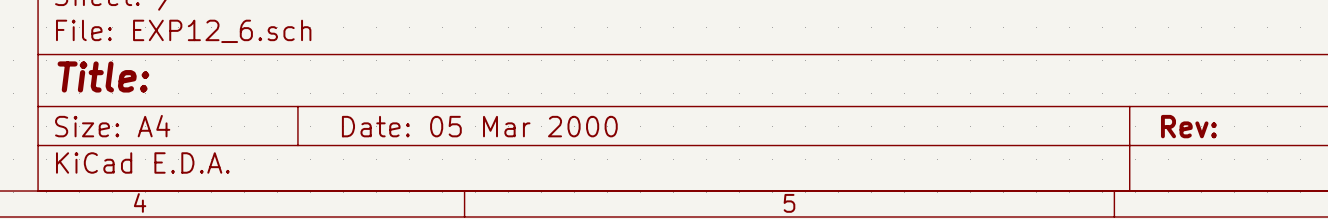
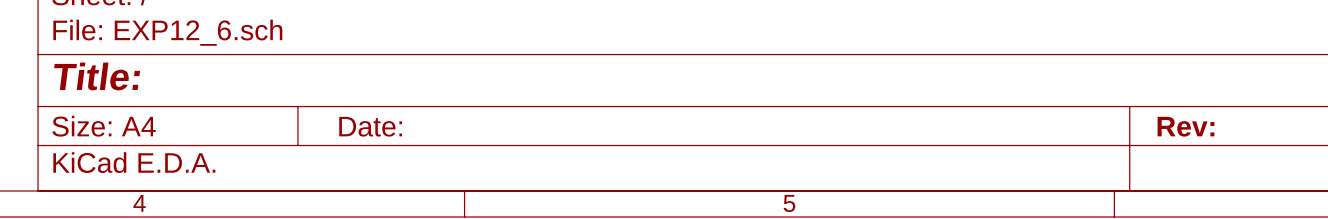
title block: Date: 05 Mar 2000 (479, 126) -> Date: (370, 126)

